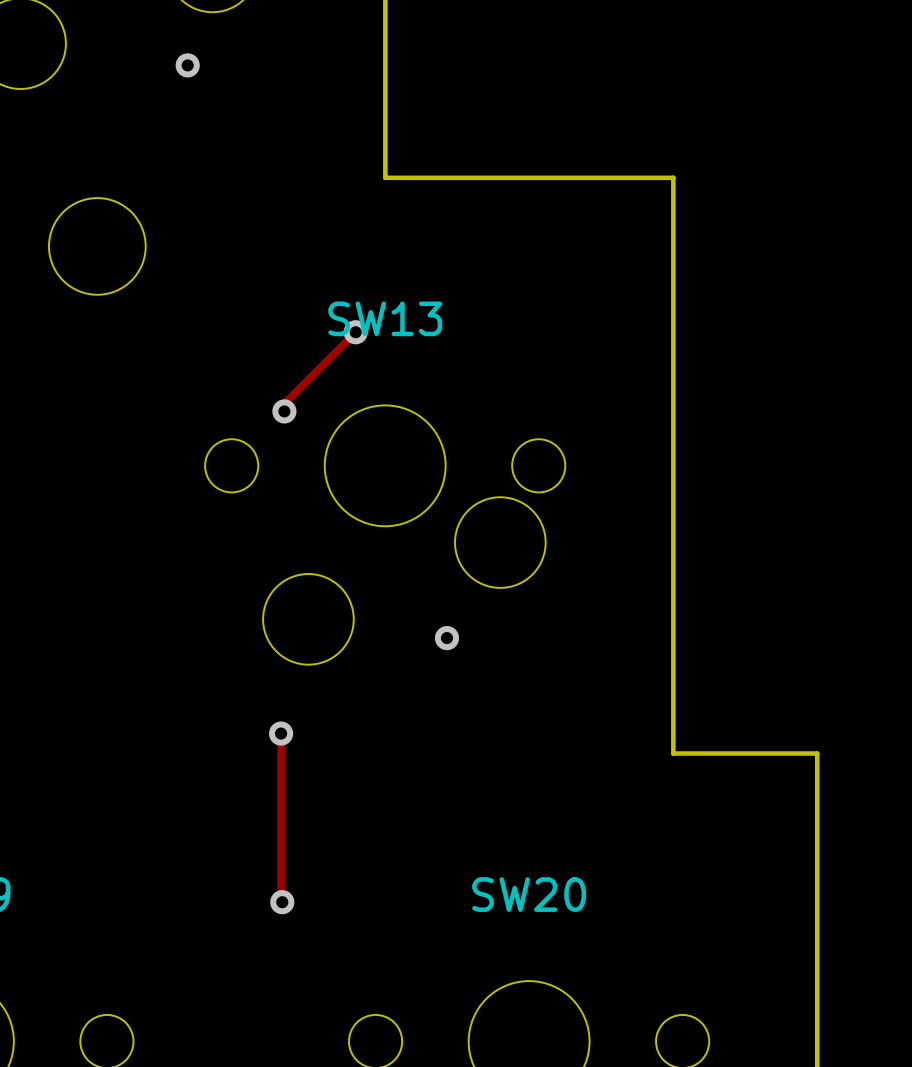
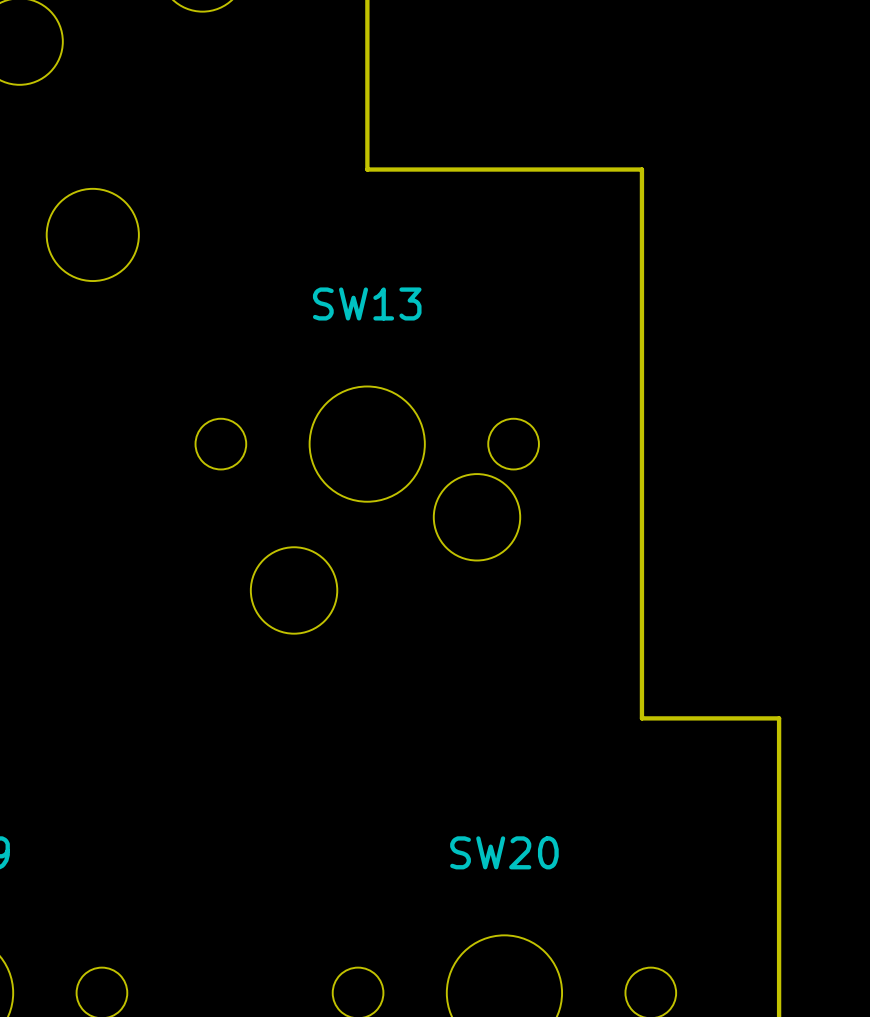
via: (187, 65) -> none
track: (355, 332) (284, 403) (284, 411) -> none
via: (355, 332) -> none
via: (284, 411) -> none
via: (446, 638) -> none
track: (281, 733) (282, 902) -> none
via: (281, 733) -> none
via: (282, 902) -> none

